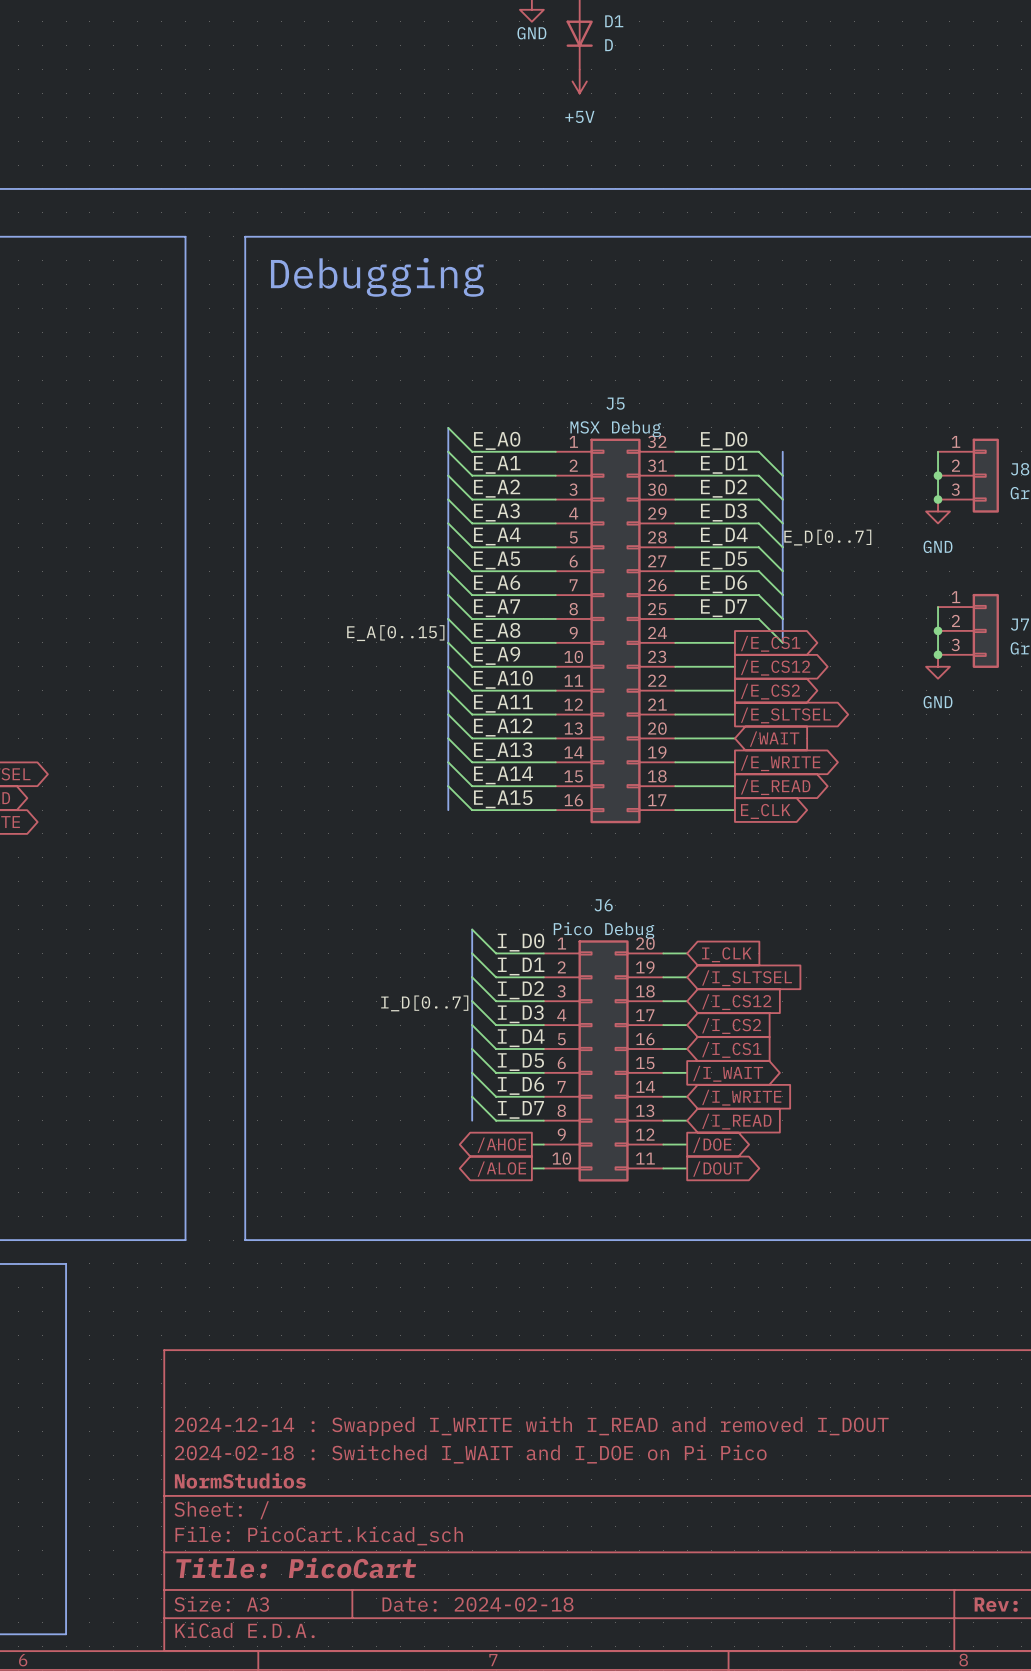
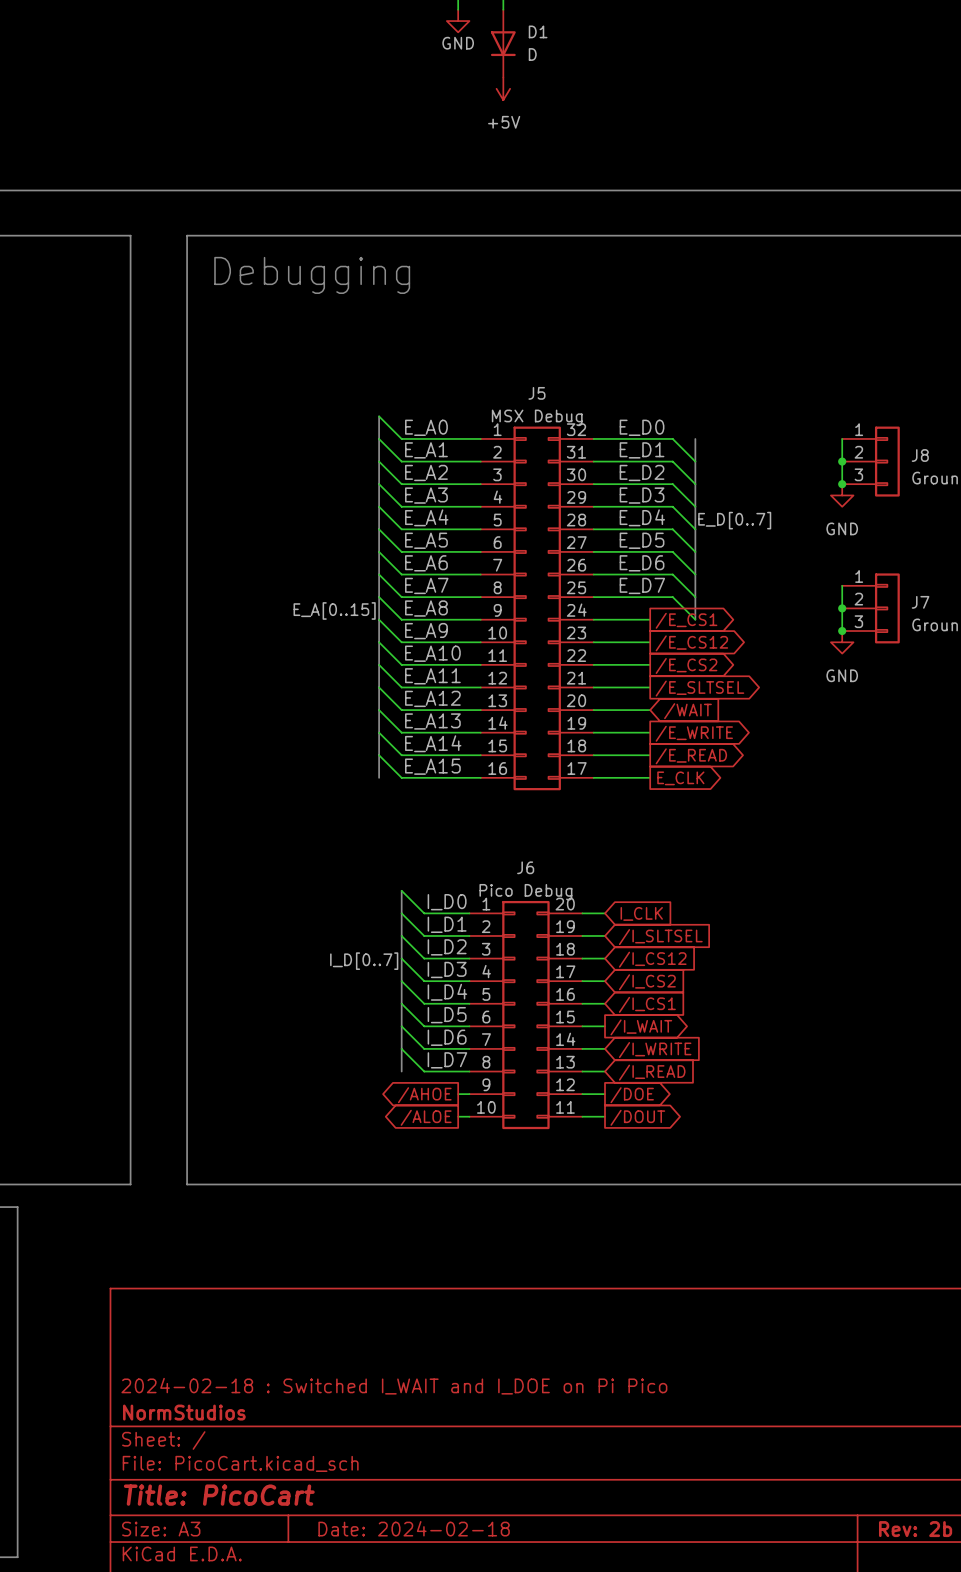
title block: 2024-12-14 : Swapped I_WRITE with I_READ and removed I_DOUT (531, 1426) -> none

